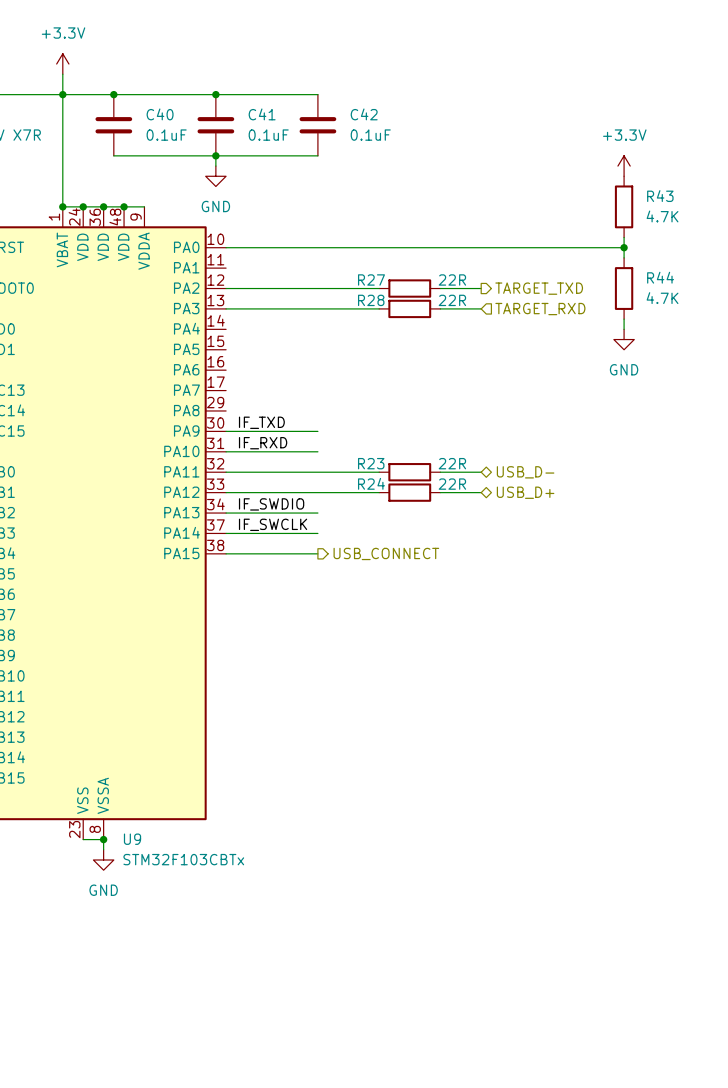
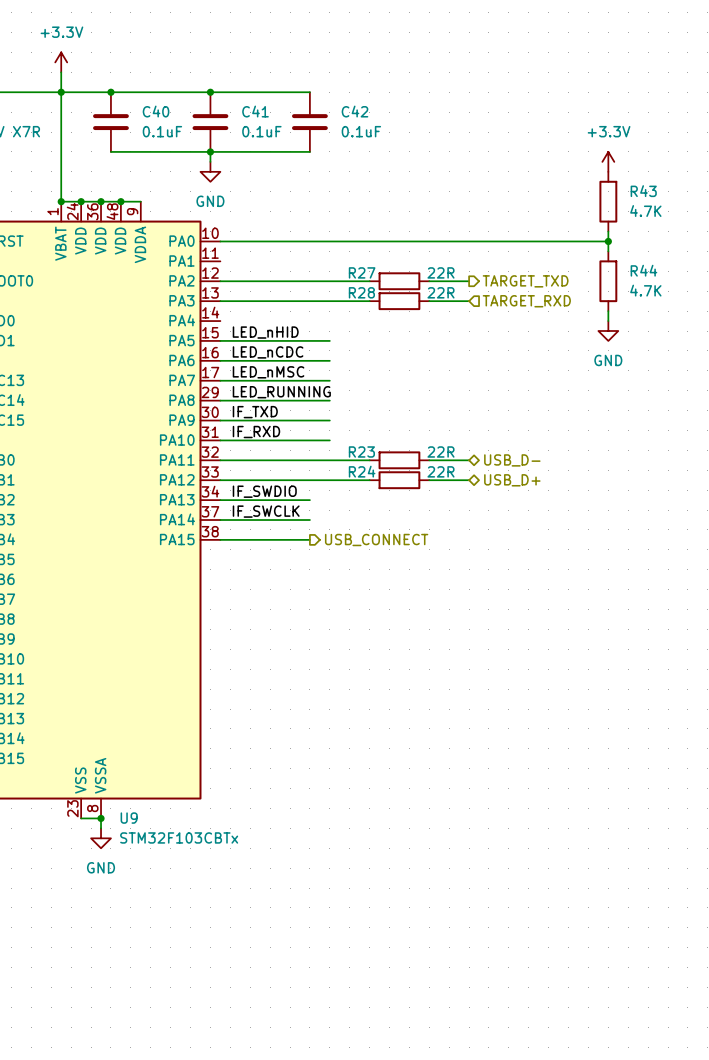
label: none -> LED_nHID (265, 332)
wire: none -> (220, 340) (329, 340)
label: none -> LED_nCDC (268, 352)
wire: none -> (220, 360) (329, 360)
label: none -> LED_nMSC (268, 372)
wire: none -> (220, 380) (329, 380)
label: none -> LED_RUNNING (281, 392)
wire: none -> (220, 400) (329, 400)
wire: none -> (309, 420) (329, 420)
wire: none -> (309, 440) (329, 440)

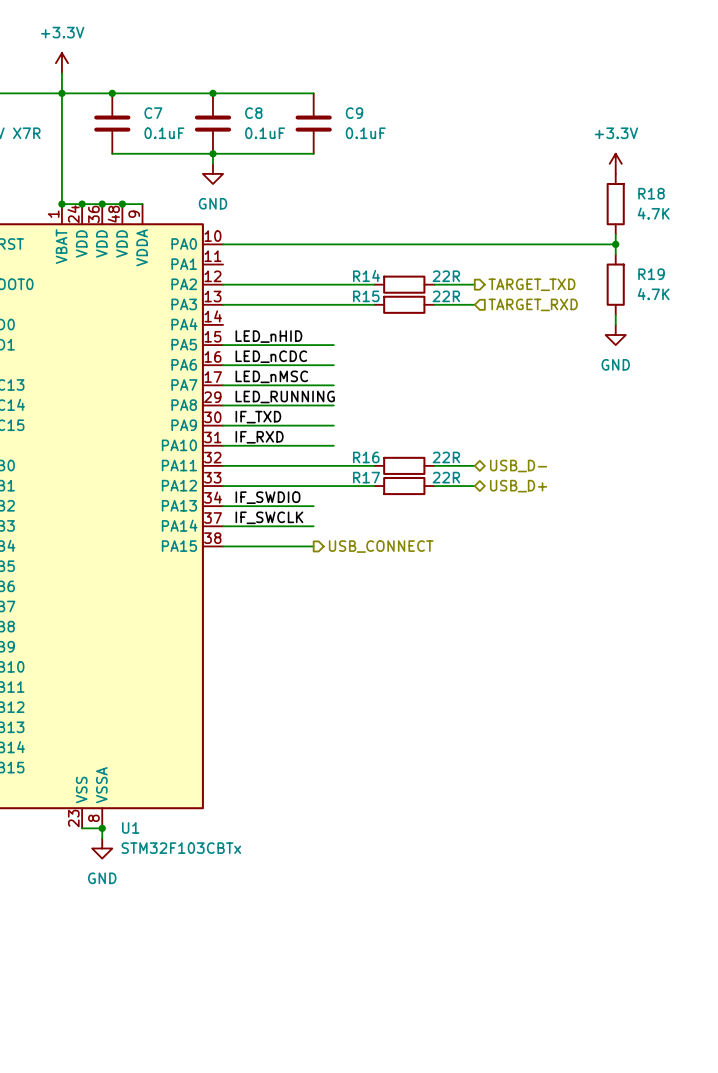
C40 name: C40 (156, 111) -> C7 (153, 113)
C41 name: C41 (255, 111) -> C8 (253, 113)
C42 name: C42 (354, 111) -> C9 (354, 113)
R43 name: R43 (643, 191) -> R18 (651, 193)
R44 name: R44 (643, 270) -> R19 (651, 274)
R27 name: R27 (362, 272) -> R14 (366, 275)
R28 name: R28 (361, 292) -> R15 (366, 296)
R23 name: R23 (361, 451) -> R16 (366, 457)
R24 name: R24 (362, 471) -> R17 (366, 477)
U9 name: U9 (129, 818) -> U1 (130, 827)

